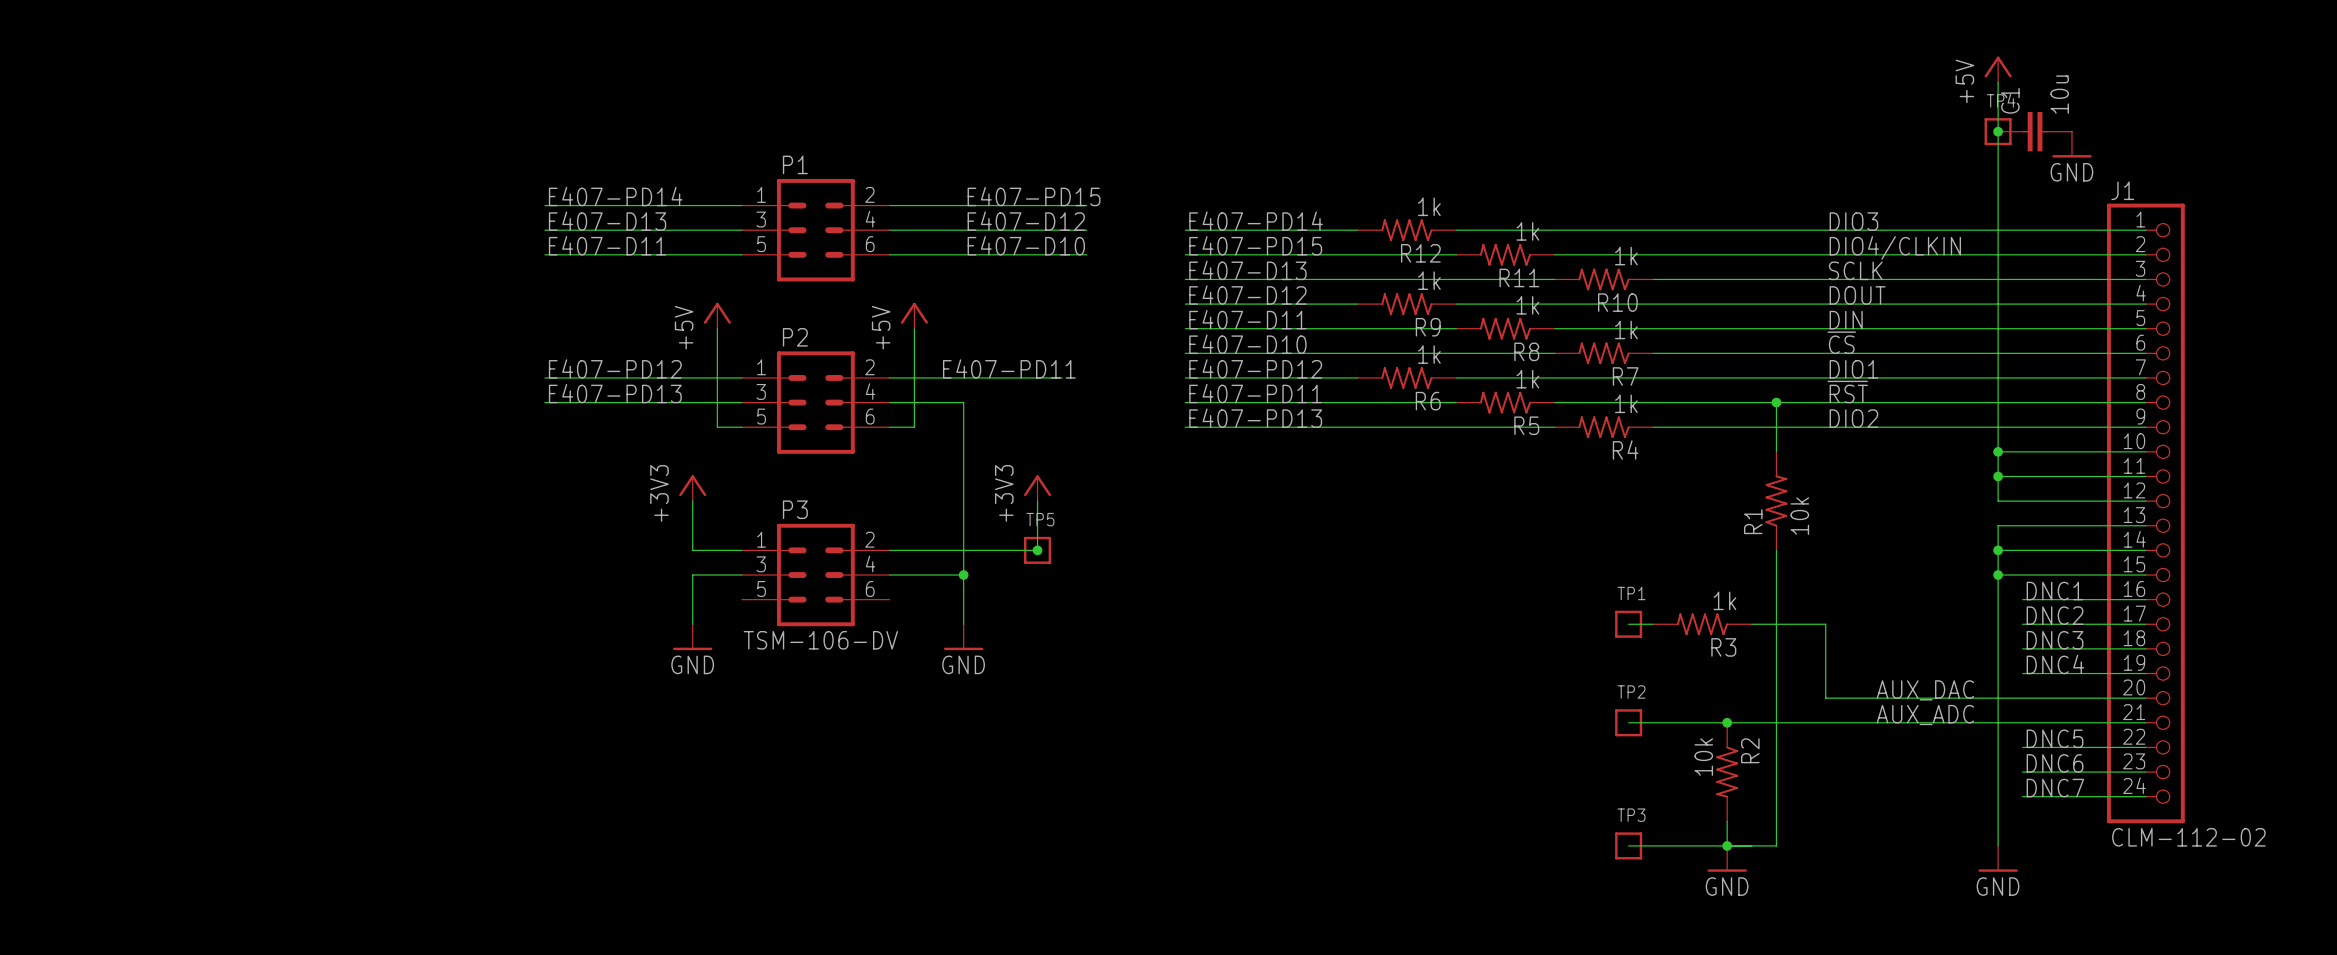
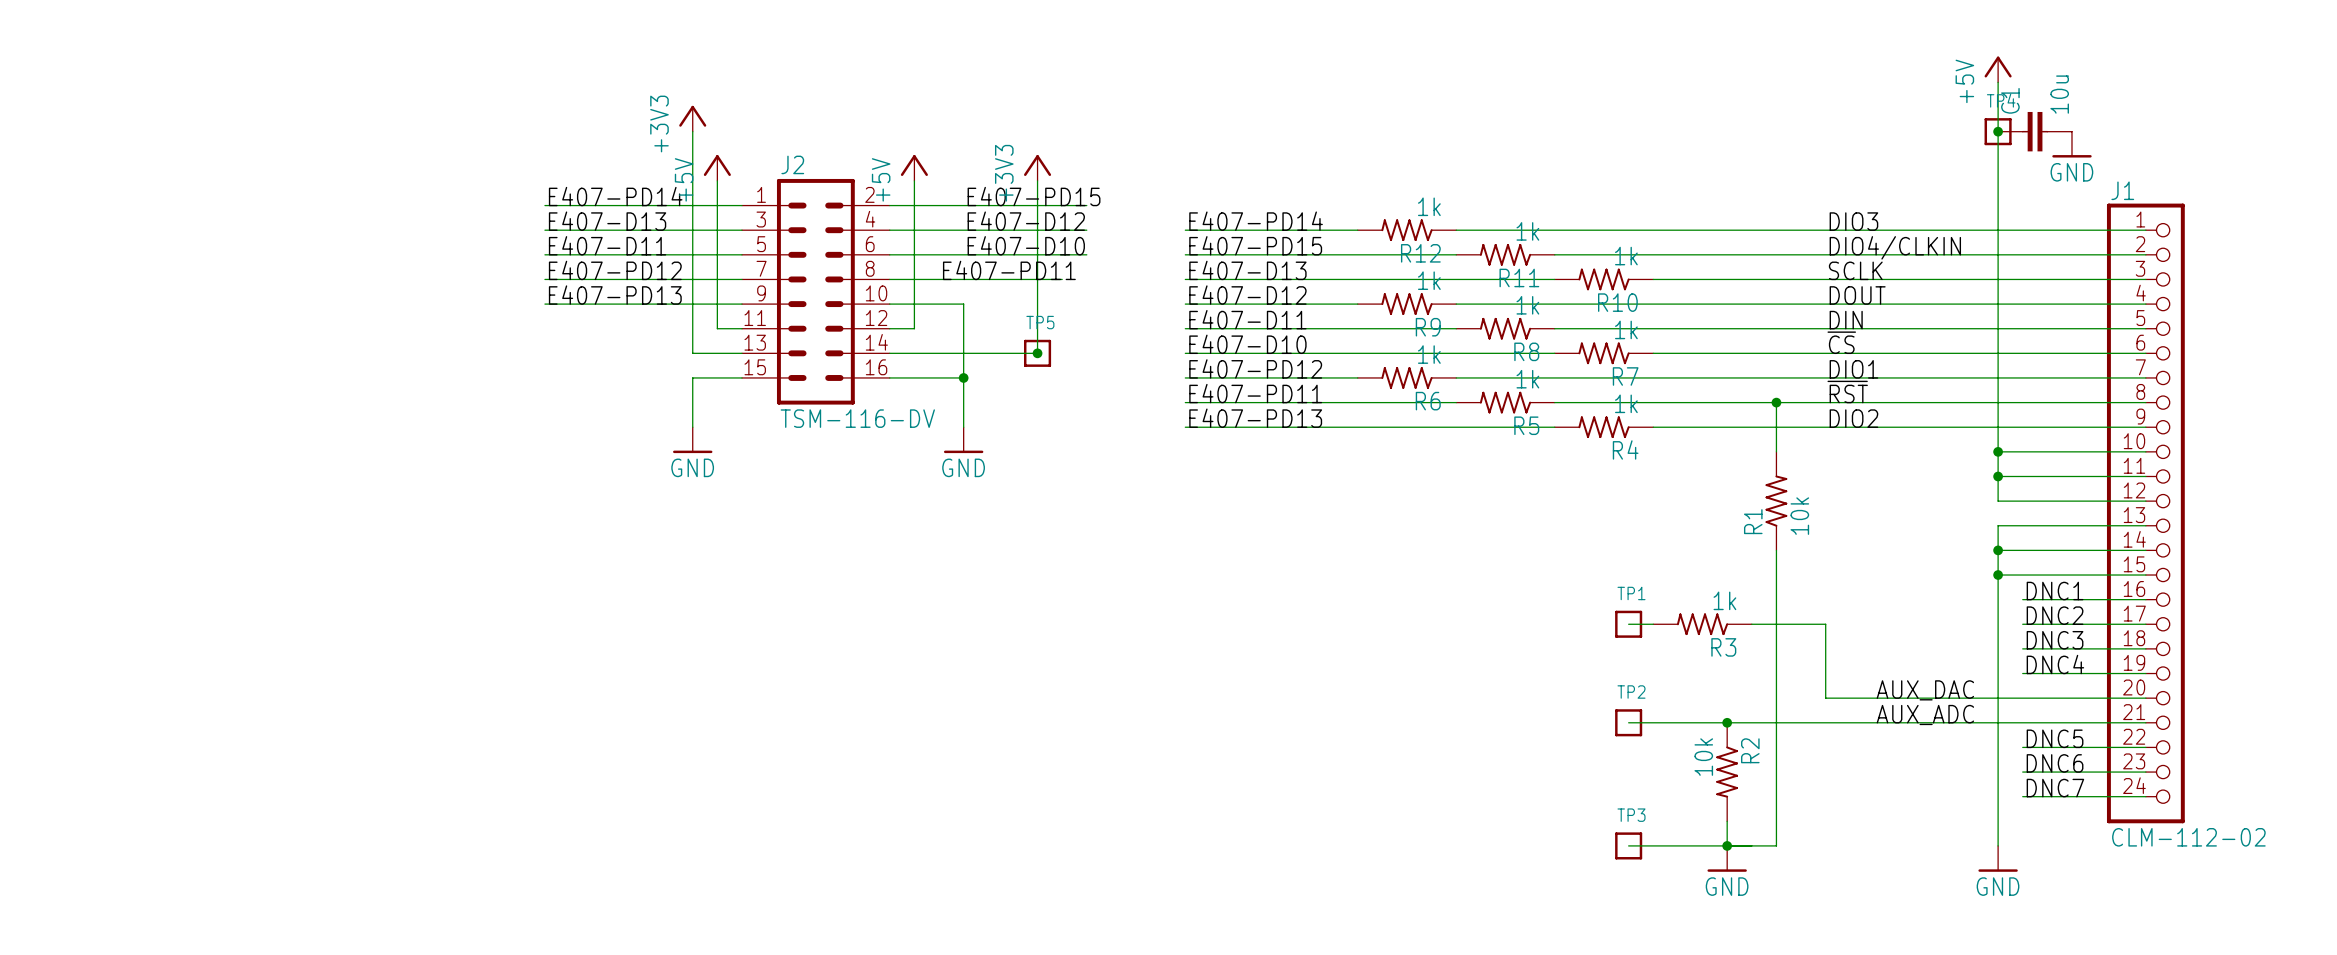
power symbol: none -> +3V3 (692, 118)
wire: none -> (692, 131) (692, 353) (741, 353)
power symbol: none -> +5V (717, 168)
power symbol: none -> +5V (914, 168)
power symbol: none -> +3V3 (1037, 168)
wire: none -> (717, 180) (717, 328) (741, 328)
wire: none -> (914, 180) (914, 328) (889, 328)
wire: none -> (1037, 180) (1037, 353) (889, 353)
P1: (815, 230) -> none
wire: none -> (544, 279) (741, 279)
wire: none -> (889, 279) (1062, 279)
J2: none -> TSM-116-DV (815, 291)
power symbol: +5V (717, 315) -> none
power symbol: +5V (914, 315) -> none
wire: (717, 328) (717, 427) (741, 427) -> none
wire: (914, 328) (914, 427) (889, 427) -> none
junction: none -> (1037, 353)
label position: E407-PD12 (615, 368) -> E407-PD12 (615, 270)
label position: E407-PD11 (1009, 368) -> E407-PD11 (1009, 270)
wire: (544, 377) (692, 377) -> (692, 427) (692, 377)
wire: (963, 377) (1062, 377) -> none
junction: none -> (963, 377)
label position: E407-PD13 (615, 393) -> E407-PD13 (615, 295)
wire: (544, 402) (741, 402) -> (544, 304) (741, 304)
P2: (815, 402) -> none
wire: (889, 402) (963, 402) -> (889, 304) (963, 304) (963, 402)
wire: (963, 427) (963, 624) -> none
power symbol: none -> GND (692, 440)
power symbol: none -> GND (963, 440)
power symbol: +3V3 (692, 488) -> none
power symbol: +3V3 (1037, 488) -> none
wire: (692, 501) (692, 550) (741, 550) -> none
wire: (1037, 501) (1037, 550) (889, 550) -> none
TP5 position: (1037, 550) -> (1037, 353)
junction: (1037, 550) -> none
wire: (741, 575) (692, 575) (692, 624) -> none
P3: TSM-106-DV (815, 575) -> none
wire: (889, 575) (963, 575) -> none
junction: (963, 575) -> none
power symbol: GND (692, 637) -> none
power symbol: GND (963, 637) -> none

